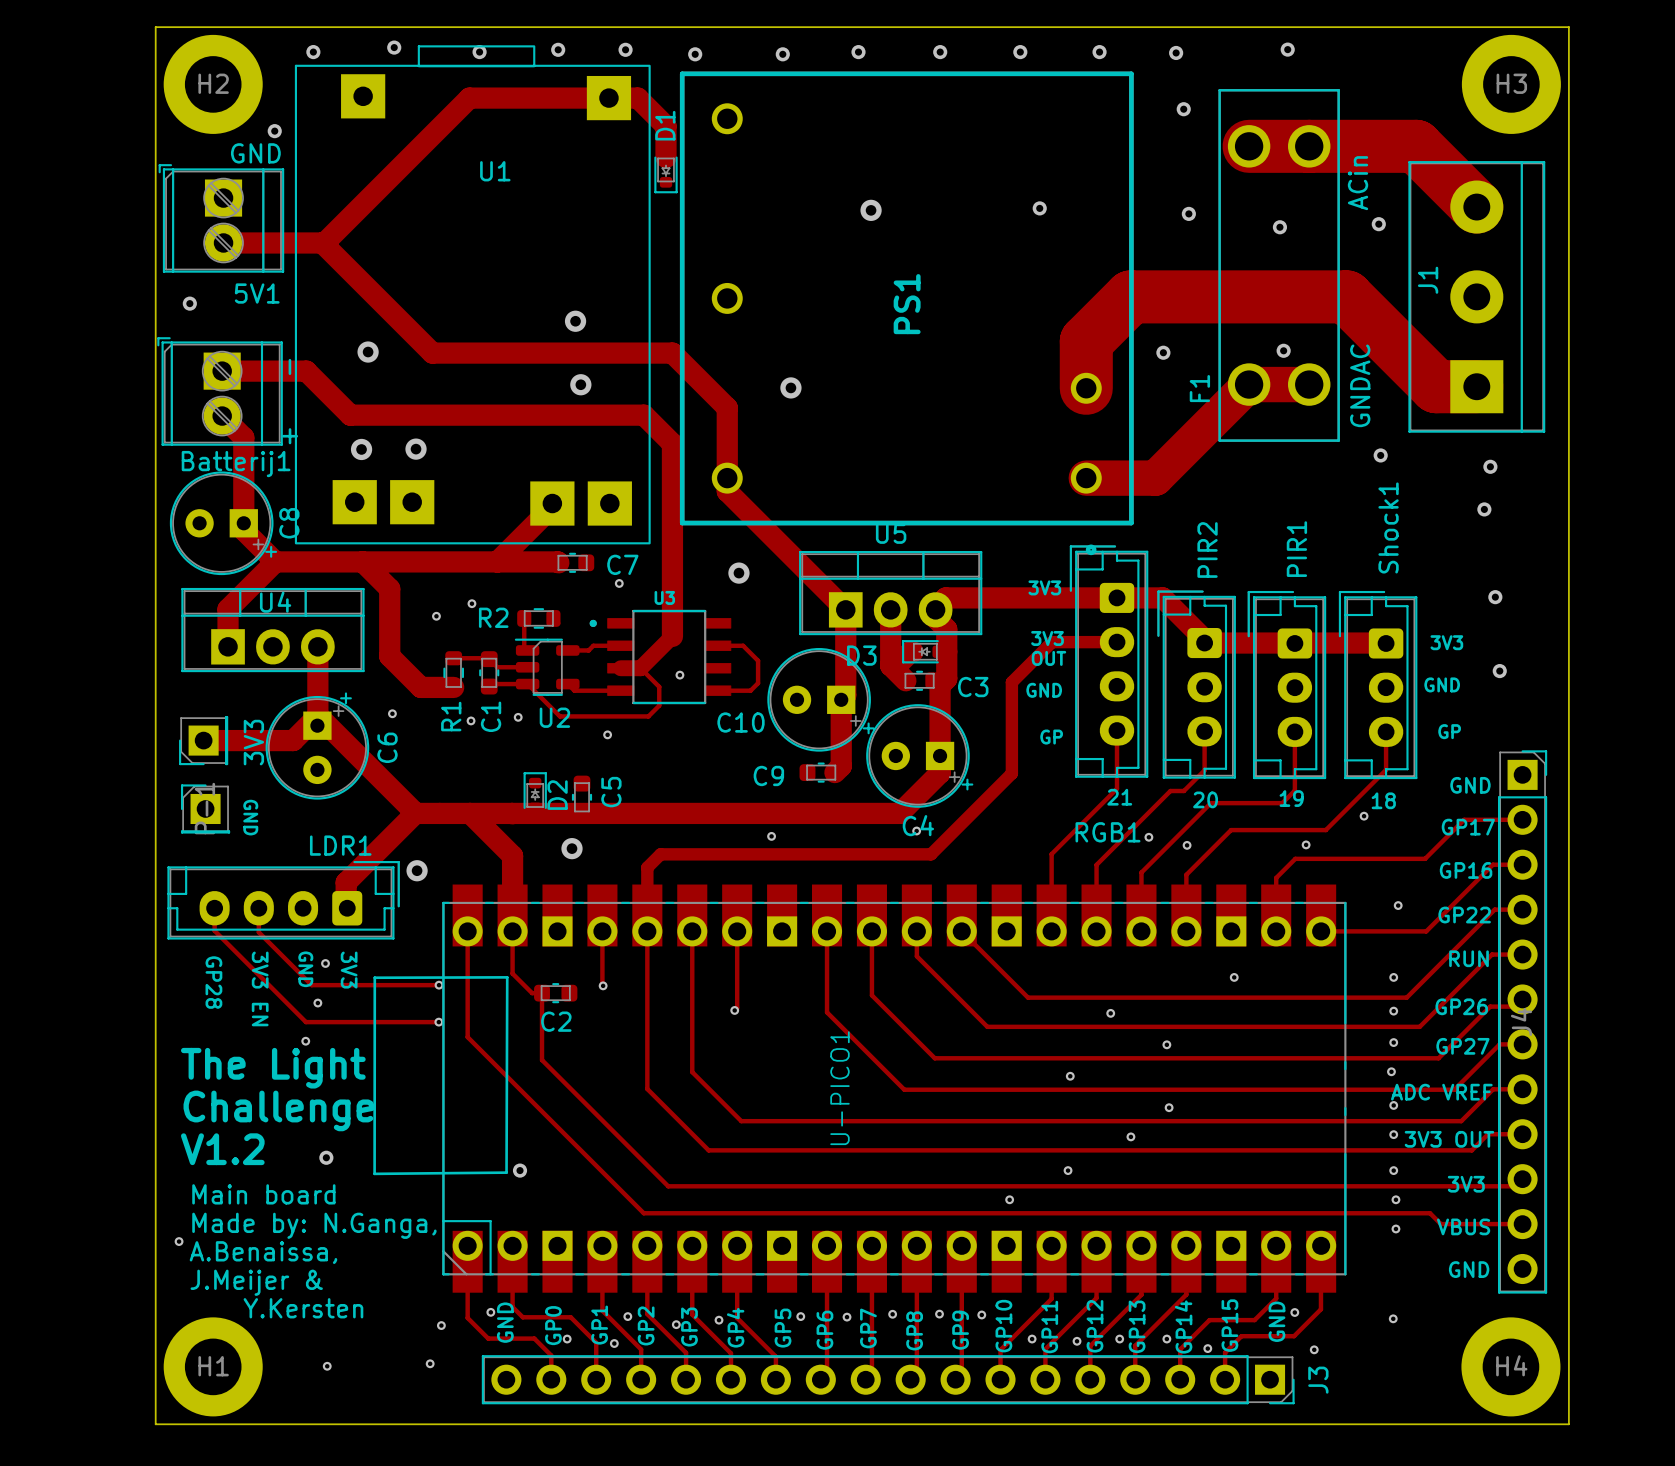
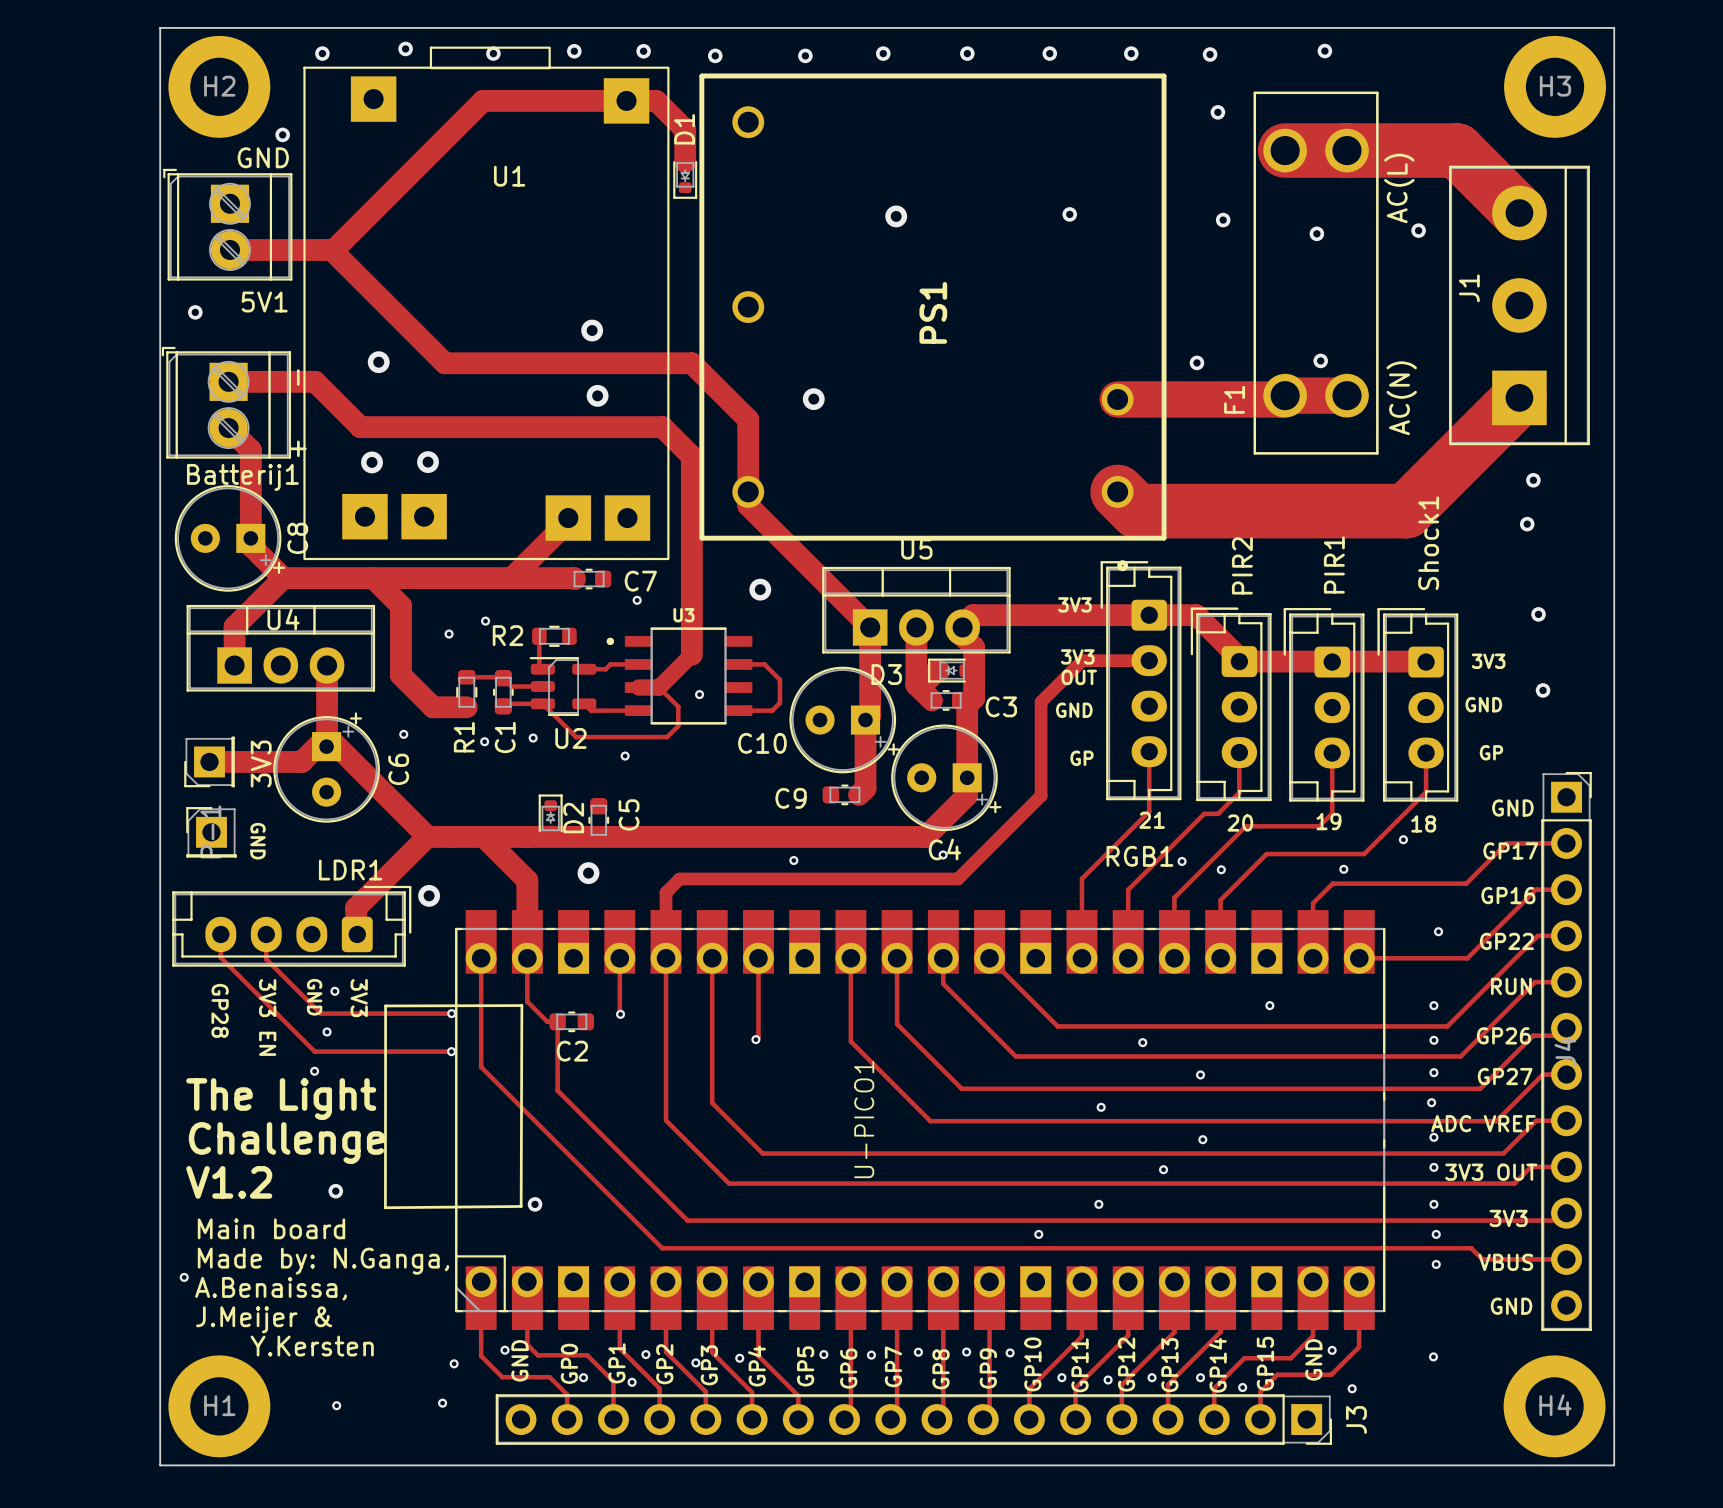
text: ACin (1358, 183) -> AC(L) (1399, 188)
text: GNDAC (1360, 385) -> AC(N) (1401, 398)
track: (1476, 386) (1436, 386) (1346, 296) (1130, 296) (1086, 341) (1086, 388) -> (1519, 397) (1406, 511) (1136, 511) (1117, 491)
track: (1245, 388) (1155, 478) (1086, 478) -> (1281, 399) (1117, 399)
via: (1380, 455) -> none

